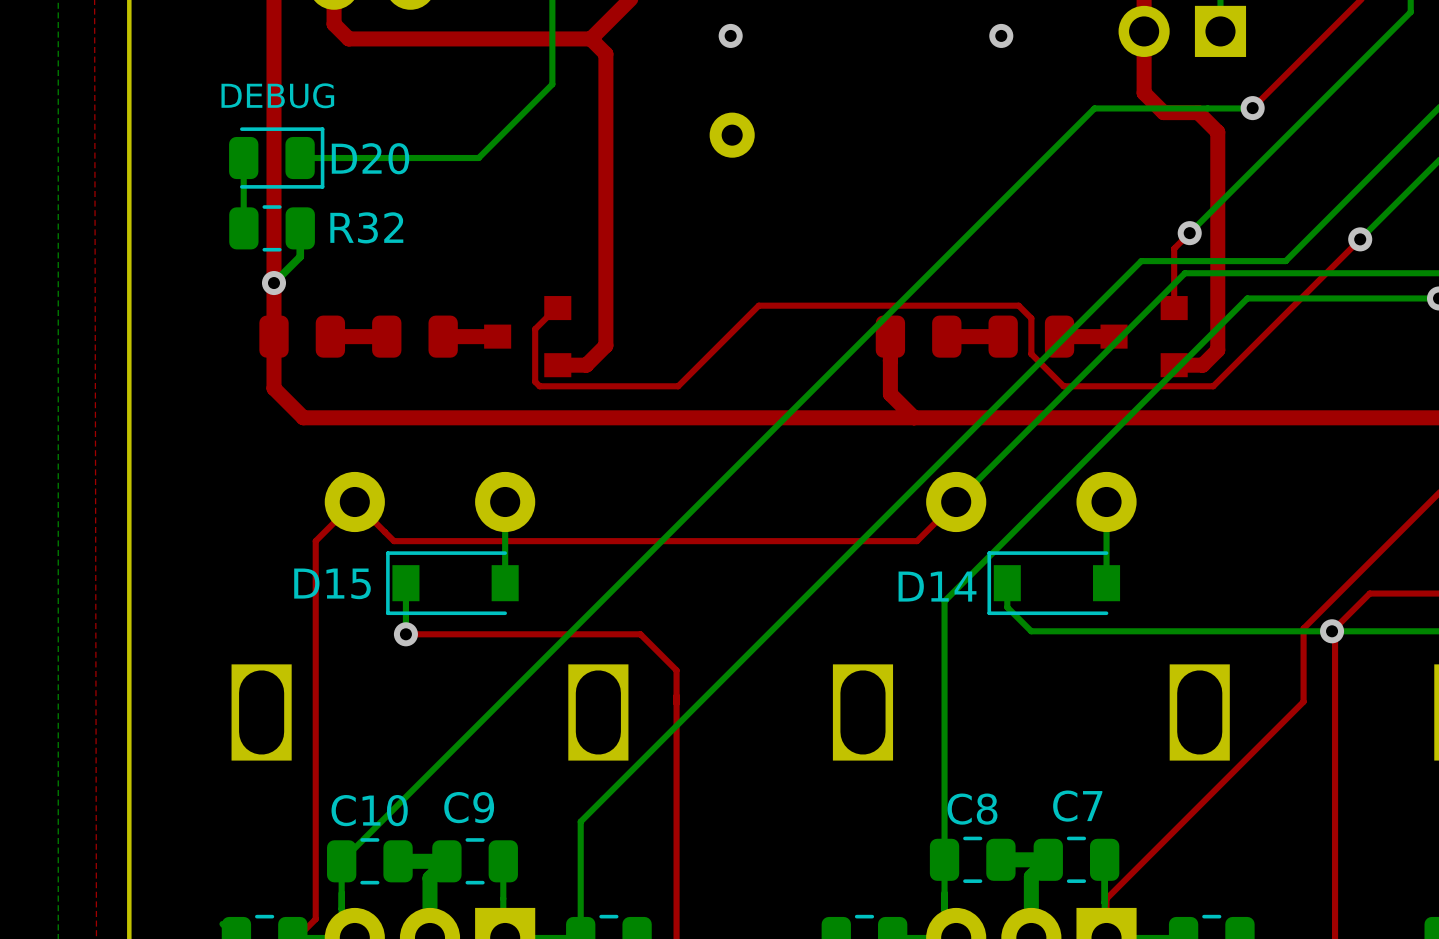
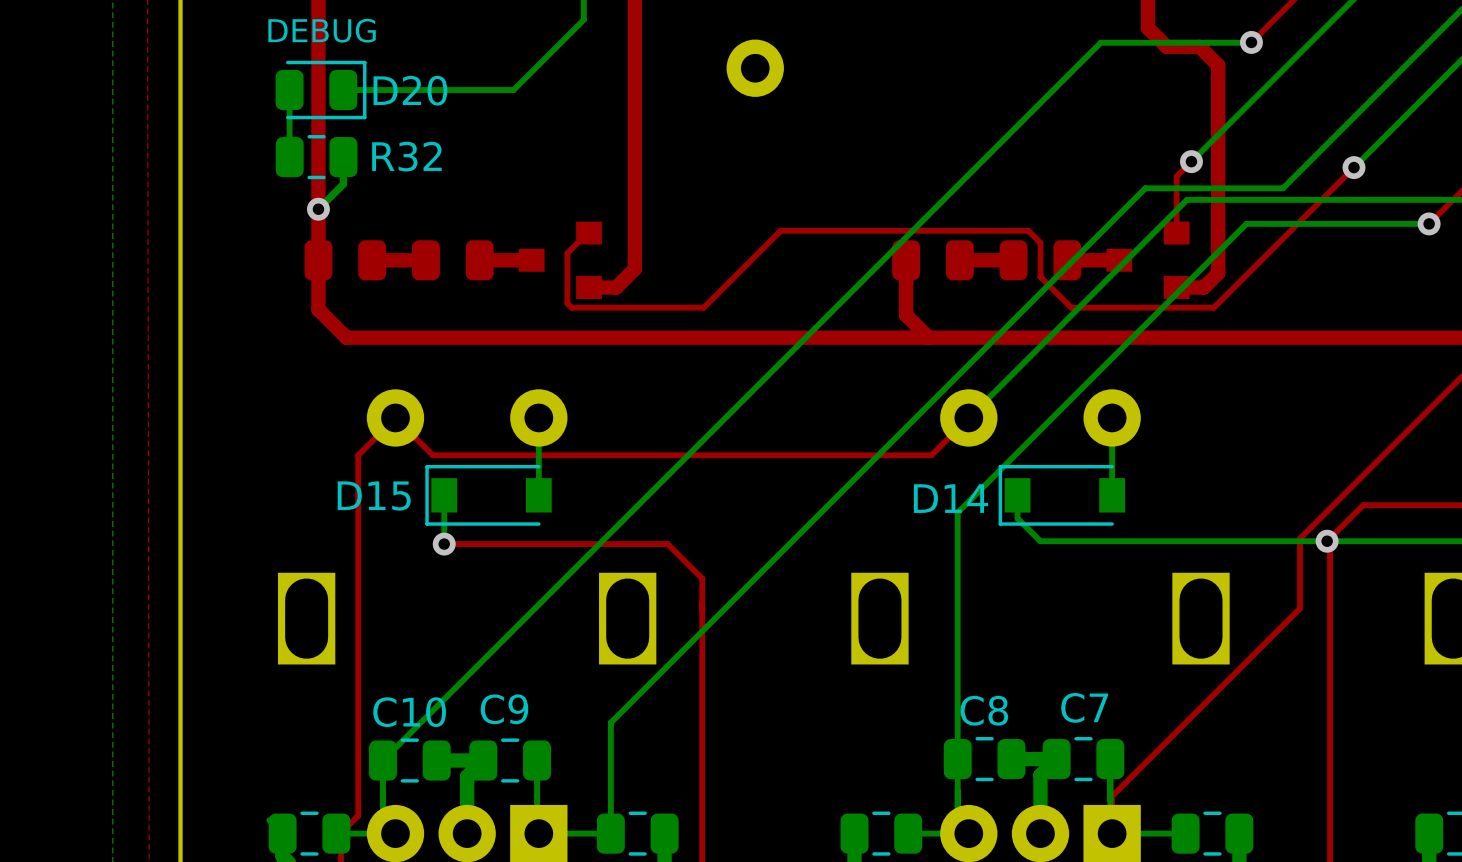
part footprint: [709, 112, 755, 158] -> [726, 39, 784, 97]

